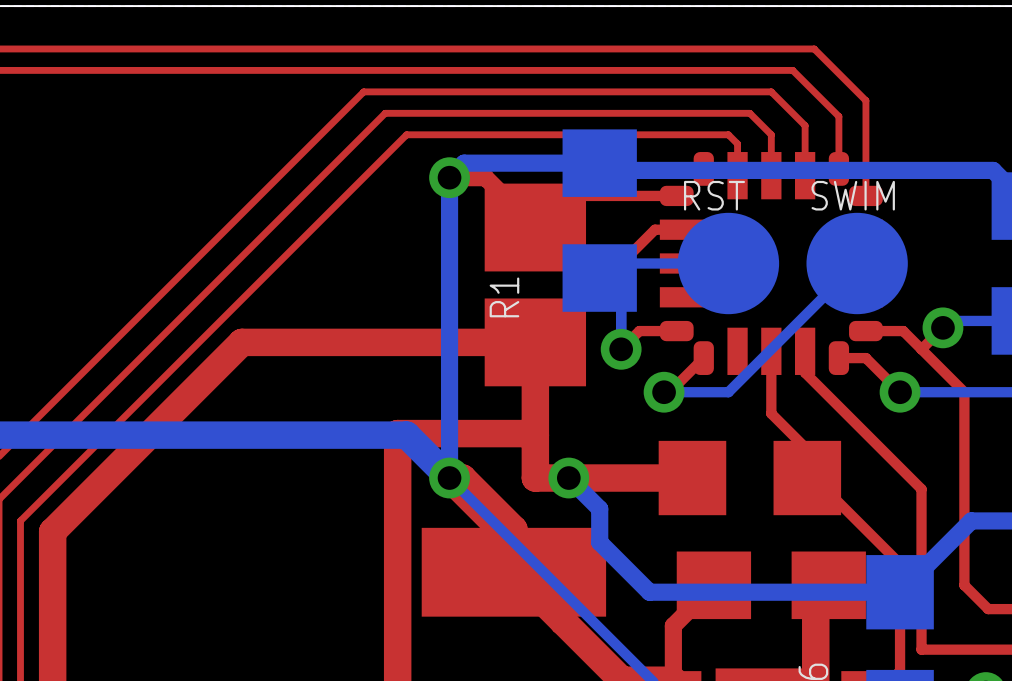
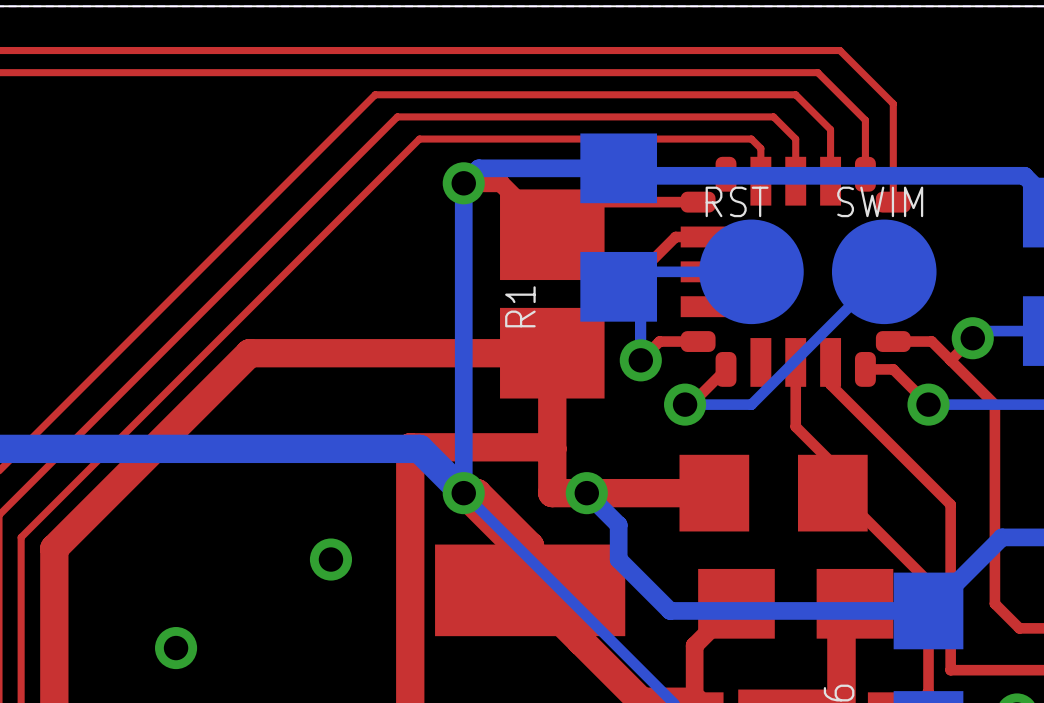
via: none -> (330, 559)
via: none -> (176, 648)

